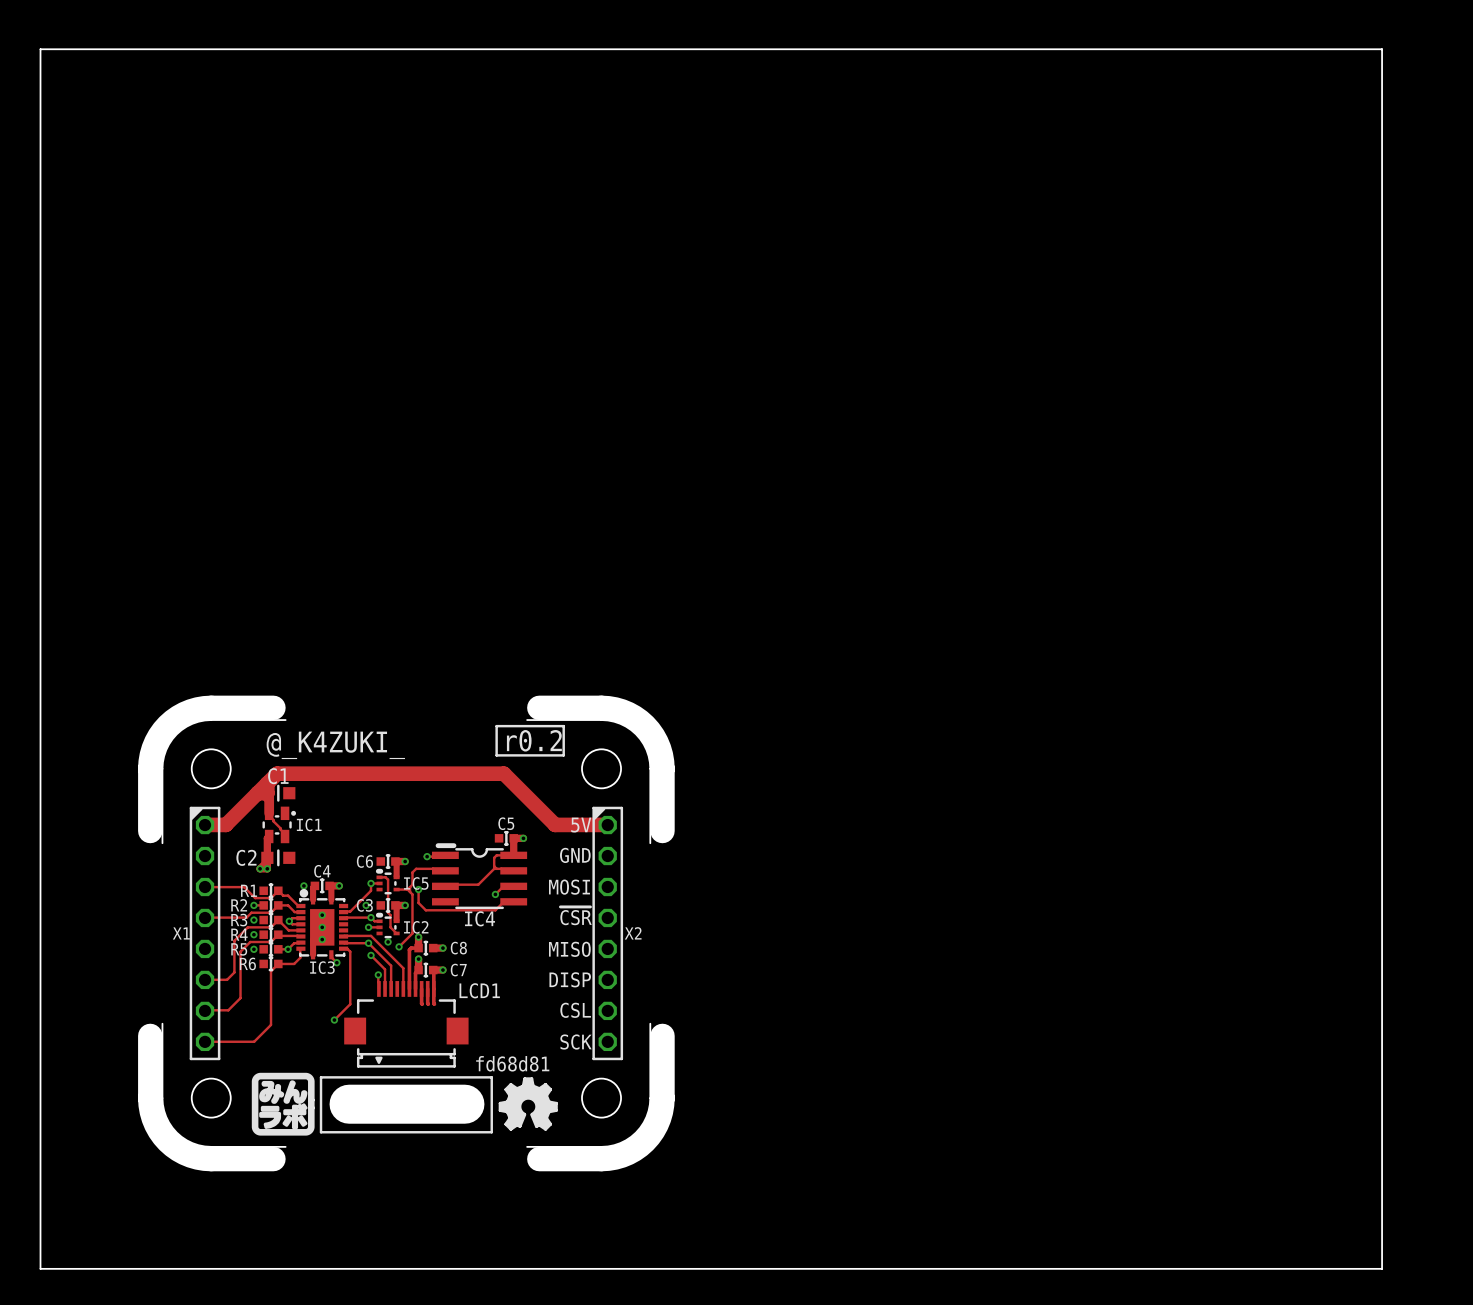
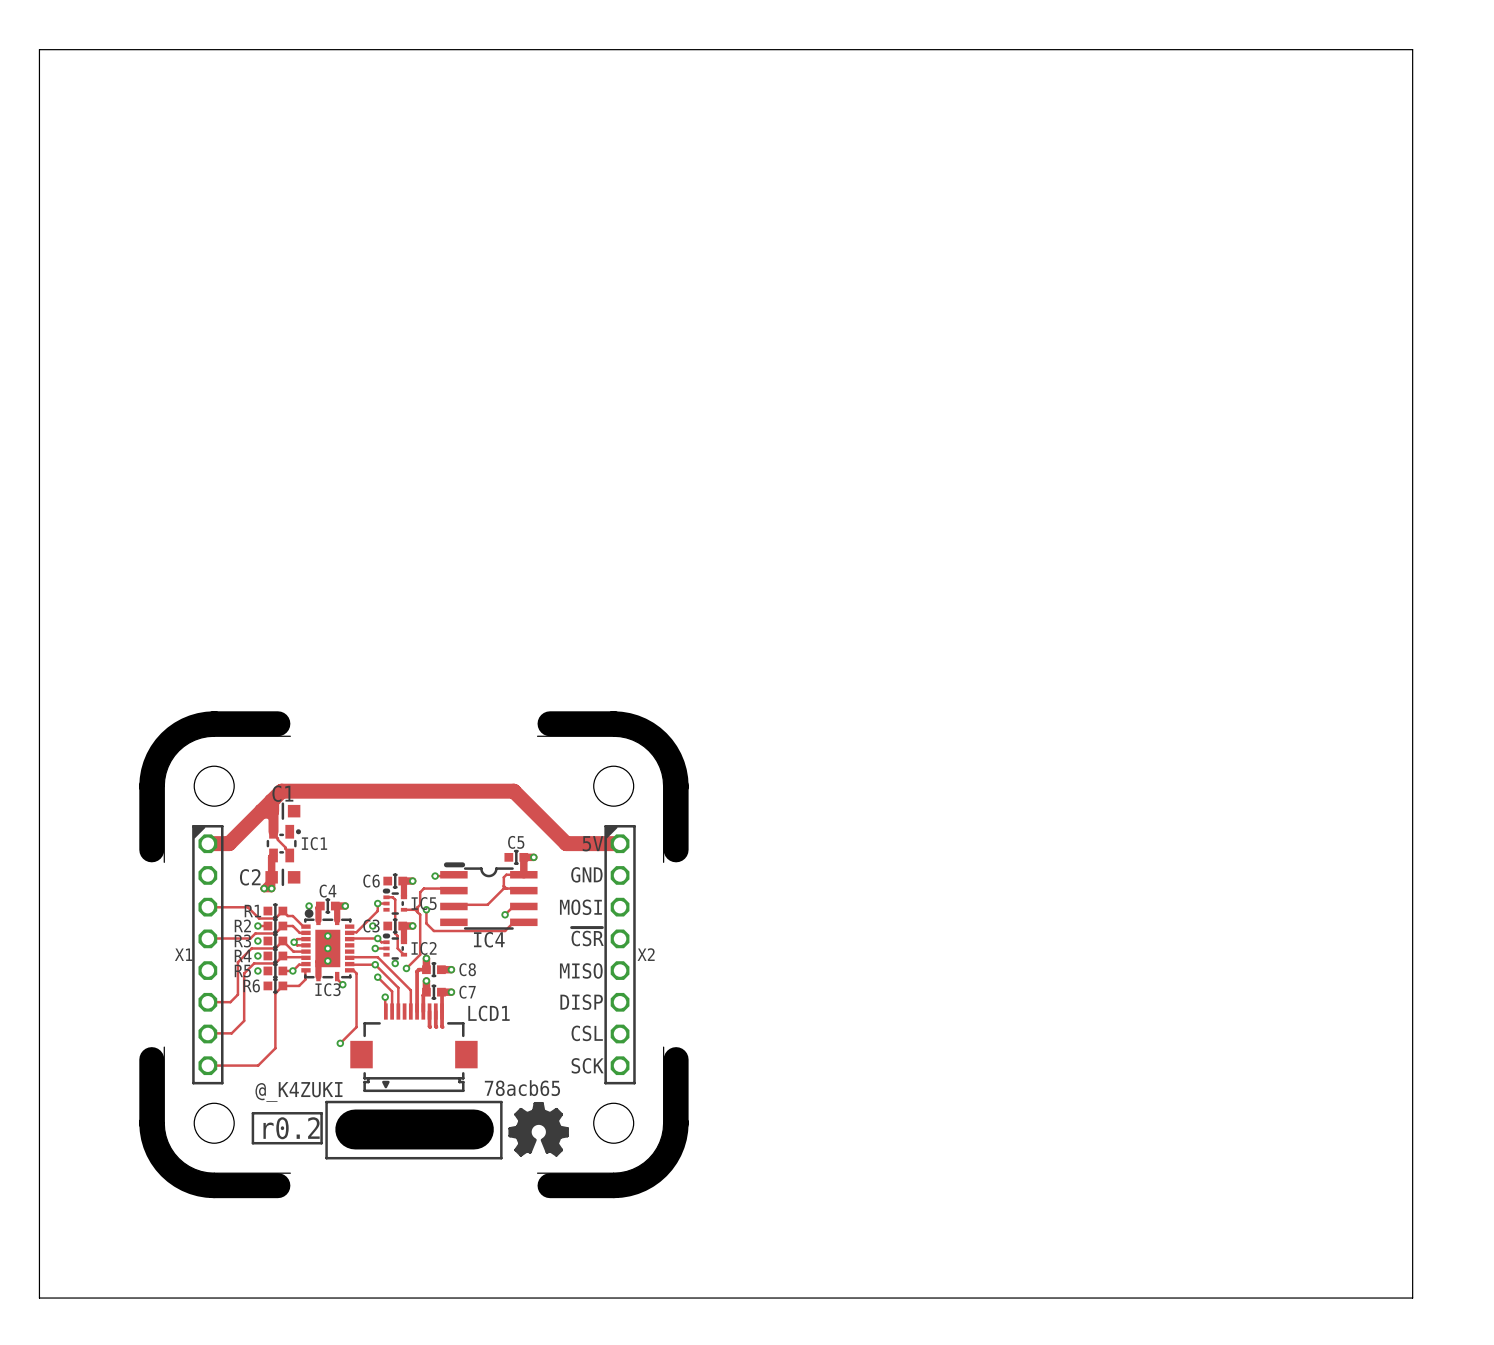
drawing: [495, 724, 565, 757] -> none
text: @_K4ZUKI_ (335, 745) -> none
drawing shape: [476, 1056, 550, 1072] -> [484, 1080, 561, 1097]
text: none -> @_K4ZUKI_ (305, 1091)
drawing shape: [251, 1072, 315, 1136] -> [251, 1112, 323, 1145]

